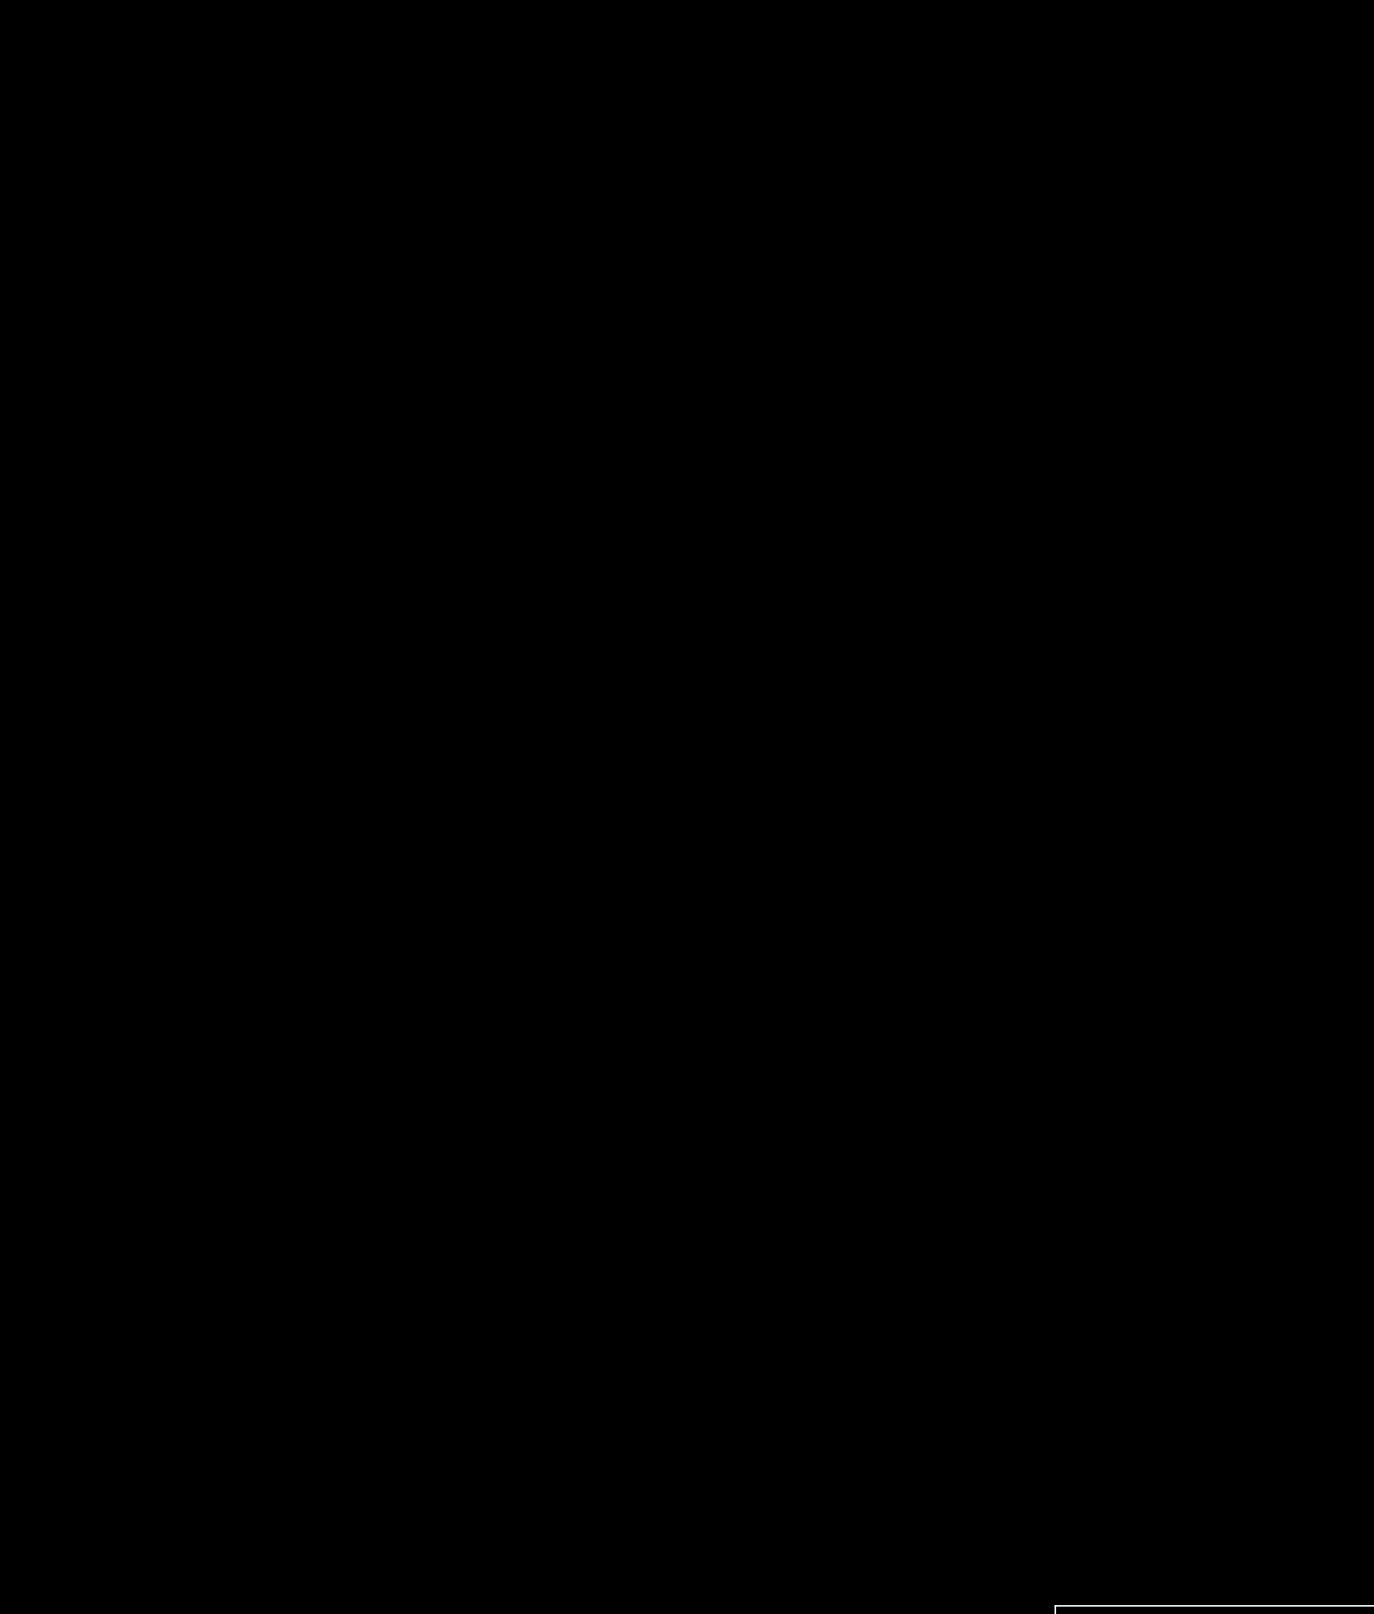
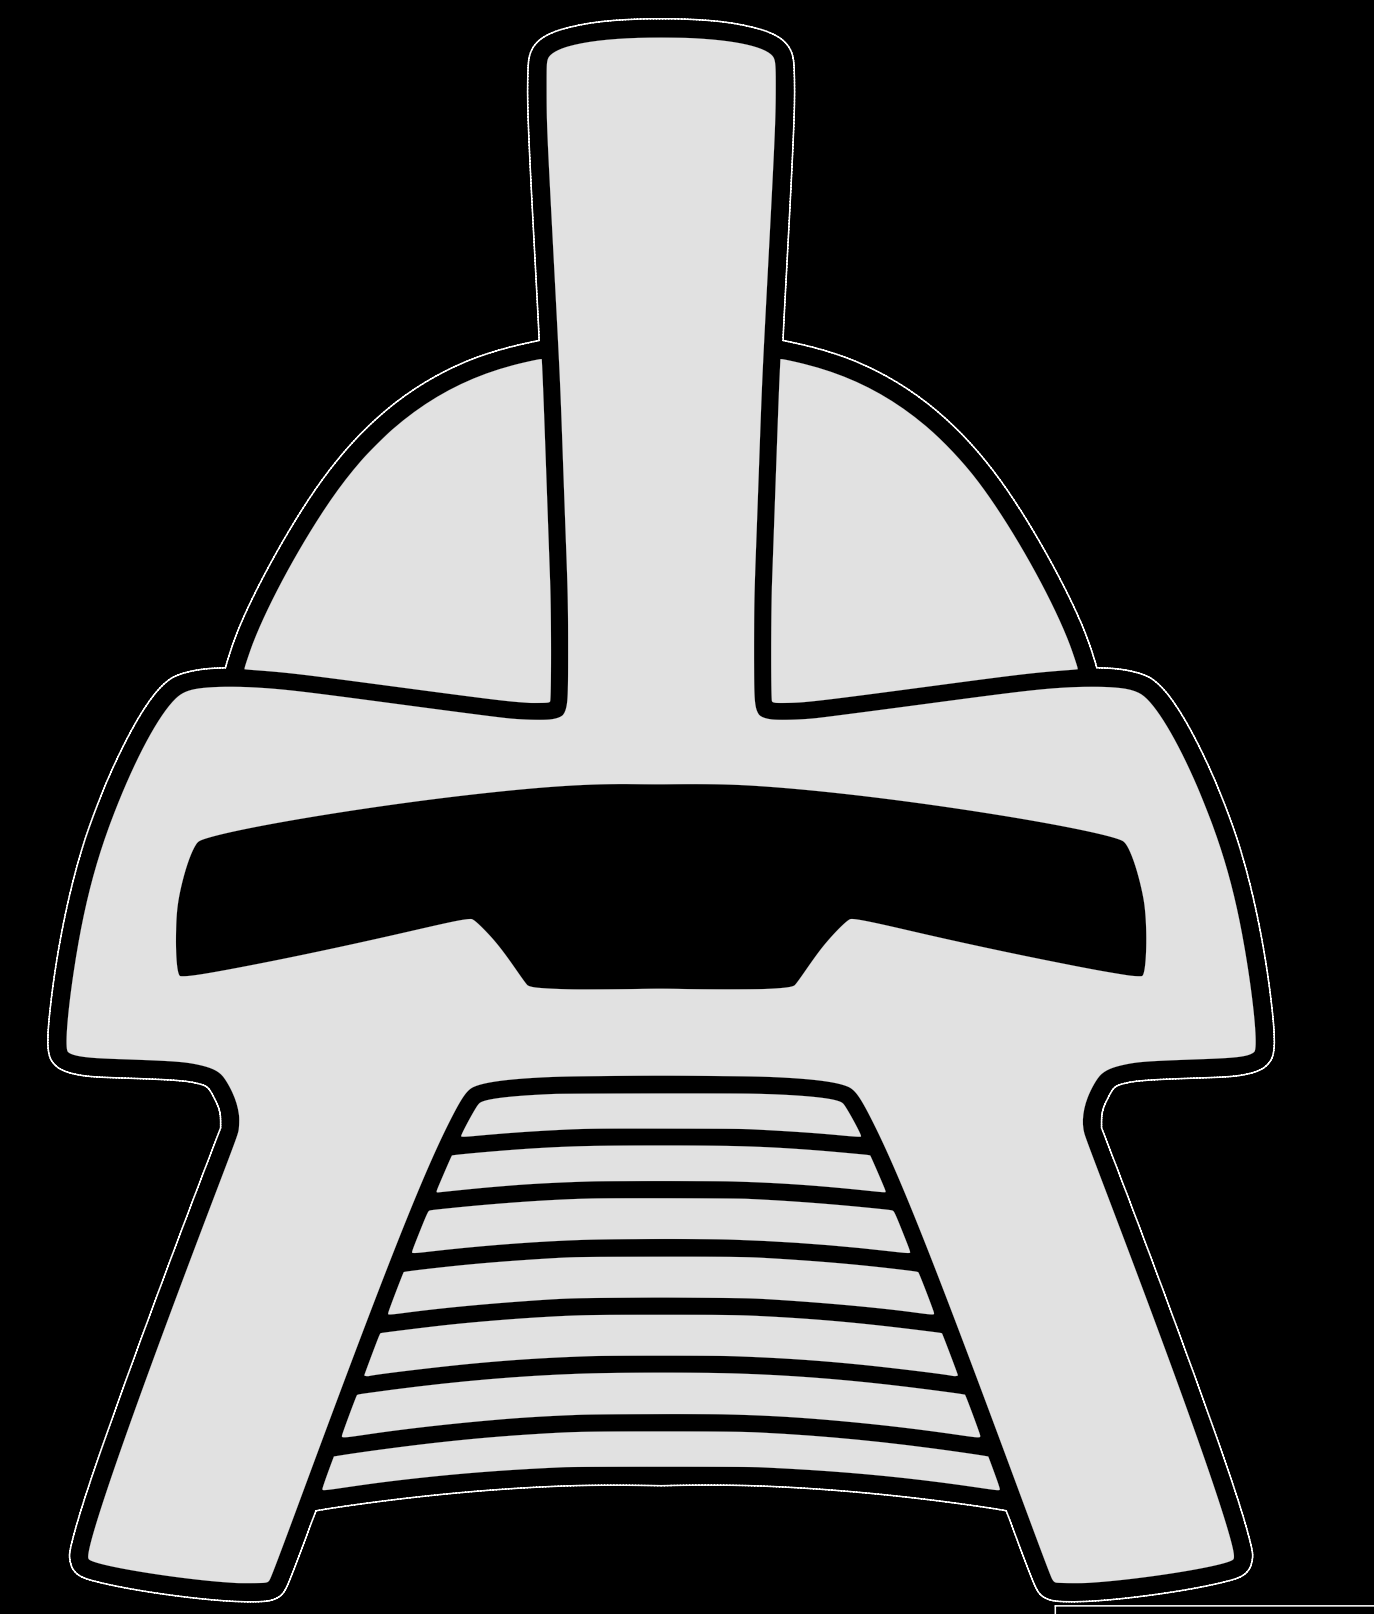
drawing: none -> [66, 37, 1256, 1584]
board edge: none -> (671, 1485) (745, 1485) (831, 1490) (918, 1498) (1006, 1510) (1036, 1588) (1043, 1596) (1053, 1600) (1086, 1601) (1146, 1595) (1206, 1585) (1243, 1575) (1249, 1567) (1252, 1554) (1241, 1509) (1189, 1361) (1101, 1127) (1101, 1116) (1108, 1096) (1113, 1088) (1118, 1085) (1136, 1081) (1230, 1076) (1252, 1072) (1261, 1069) (1269, 1062) (1272, 1055) (1274, 1042) (1270, 998) (1263, 948) (1253, 899) (1240, 850) (1211, 772) (1190, 730) (1173, 701) (1158, 683) (1144, 675) (1123, 669) (1096, 667) (1075, 610) (1027, 521) (985, 460) (944, 417) (906, 388) (865, 365) (823, 350) (783, 340) (794, 104) (793, 60) (789, 47) (783, 40) (772, 33) (743, 25) (708, 20) (650, 18) (602, 21) (560, 29) (541, 38) (530, 52) (528, 67) (528, 117) (539, 340) (487, 353) (446, 370) (405, 395) (368, 425) (329, 470) (288, 532) (246, 610) (225, 667) (193, 670) (171, 678) (156, 692) (136, 720) (106, 782) (78, 862) (56, 961) (47, 1042) (49, 1055) (52, 1062) (60, 1069) (70, 1072) (91, 1076) (185, 1081) (203, 1085) (208, 1088) (213, 1096) (220, 1116) (220, 1127) (132, 1361) (81, 1510) (69, 1554) (72, 1567) (79, 1575) (115, 1586) (175, 1595) (235, 1601) (269, 1600) (278, 1596) (285, 1588) (315, 1510) (403, 1498) (502, 1489) (576, 1485) (671, 1485)

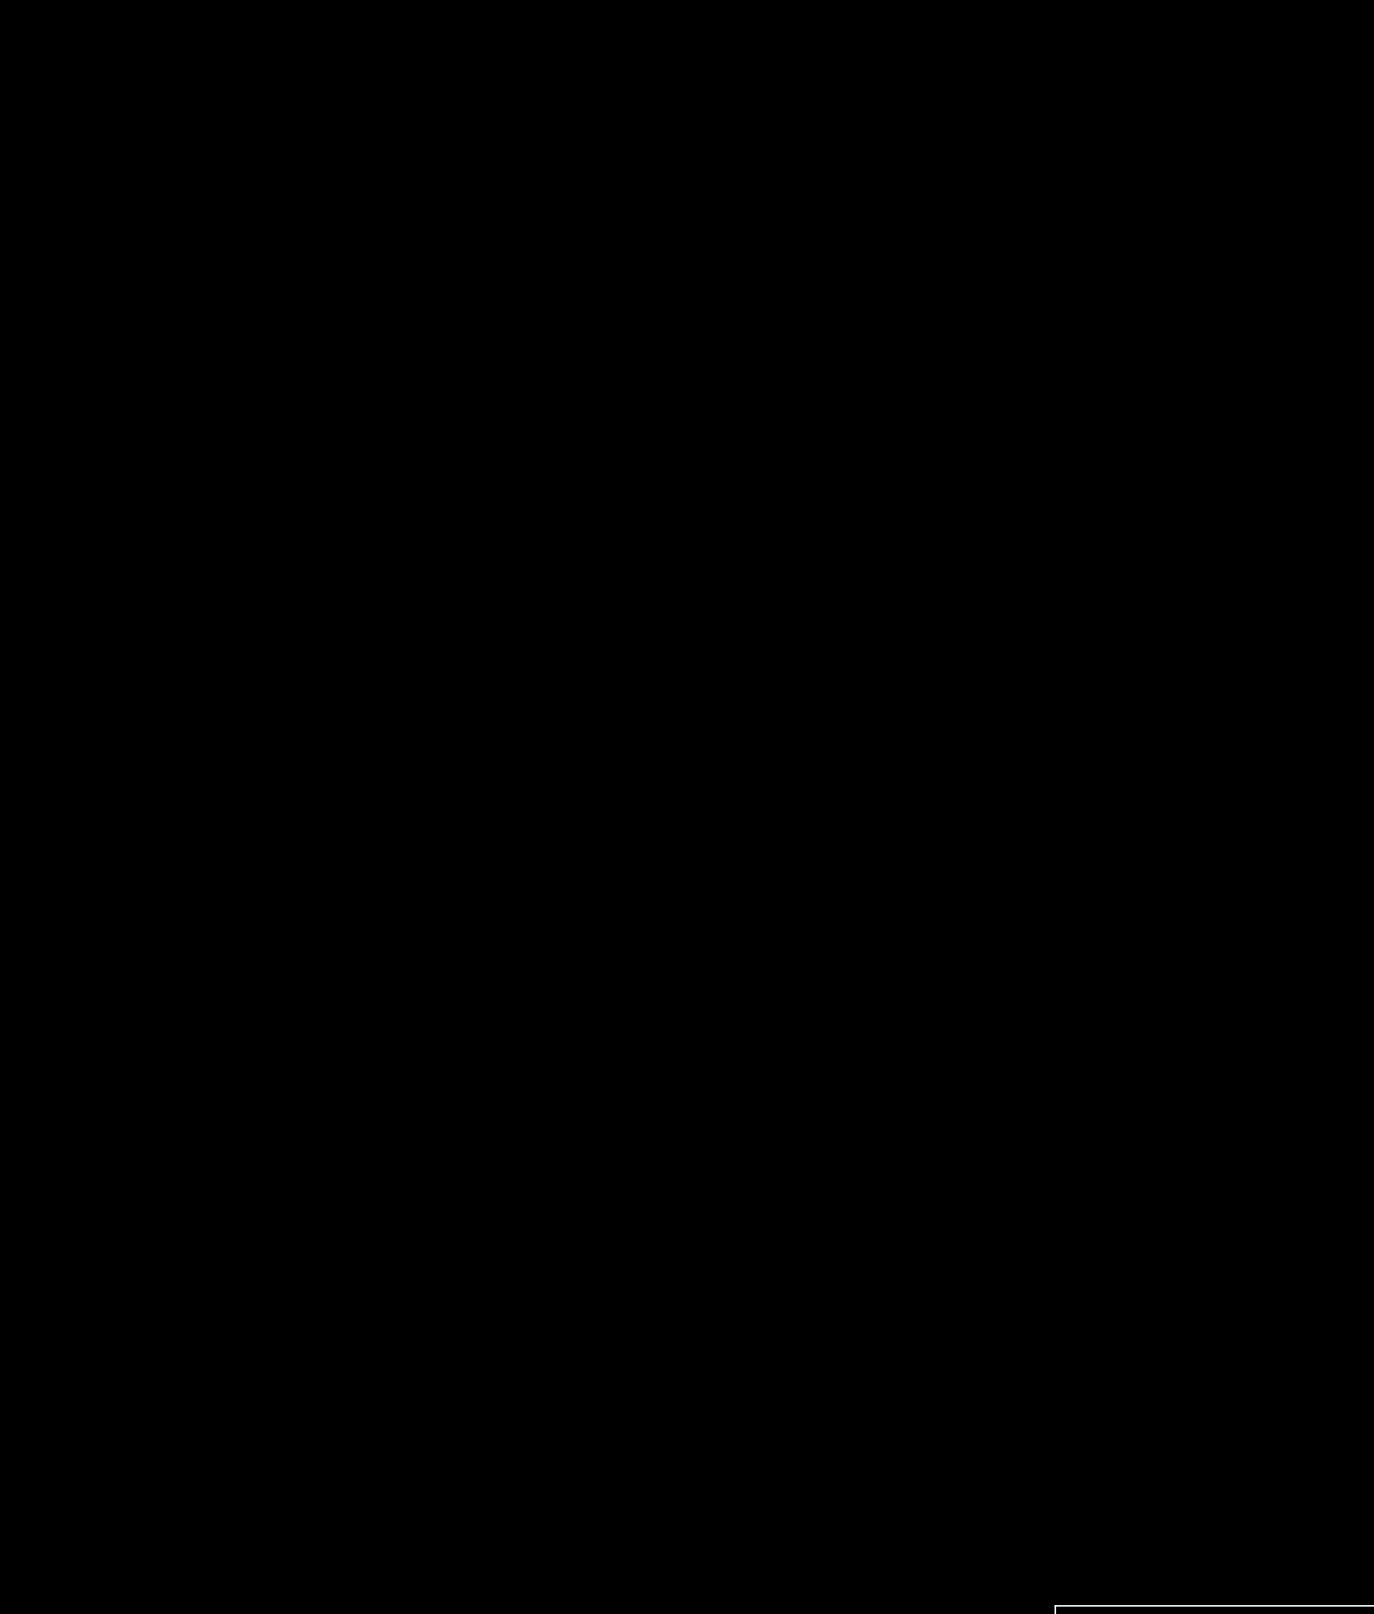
drawing: [66, 37, 1256, 1584] -> none
board edge: (671, 1485) (745, 1485) (831, 1490) (918, 1498) (1006, 1510) (1036, 1588) (1043, 1596) (1053, 1600) (1086, 1601) (1146, 1595) (1206, 1585) (1243, 1575) (1249, 1567) (1252, 1554) (1241, 1509) (1189, 1361) (1101, 1127) (1101, 1116) (1108, 1096) (1113, 1088) (1118, 1085) (1136, 1081) (1230, 1076) (1252, 1072) (1261, 1069) (1269, 1062) (1272, 1055) (1274, 1042) (1270, 998) (1263, 948) (1253, 899) (1240, 850) (1211, 772) (1190, 730) (1173, 701) (1158, 683) (1144, 675) (1123, 669) (1096, 667) (1075, 610) (1027, 521) (985, 460) (944, 417) (906, 388) (865, 365) (823, 350) (783, 340) (794, 104) (793, 60) (789, 47) (783, 40) (772, 33) (743, 25) (708, 20) (650, 18) (602, 21) (560, 29) (541, 38) (530, 52) (528, 67) (528, 117) (539, 340) (487, 353) (446, 370) (405, 395) (368, 425) (329, 470) (288, 532) (246, 610) (225, 667) (193, 670) (171, 678) (156, 692) (136, 720) (106, 782) (78, 862) (56, 961) (47, 1042) (49, 1055) (52, 1062) (60, 1069) (70, 1072) (91, 1076) (185, 1081) (203, 1085) (208, 1088) (213, 1096) (220, 1116) (220, 1127) (132, 1361) (81, 1510) (69, 1554) (72, 1567) (79, 1575) (115, 1586) (175, 1595) (235, 1601) (269, 1600) (278, 1596) (285, 1588) (315, 1510) (403, 1498) (502, 1489) (576, 1485) (671, 1485) -> none

